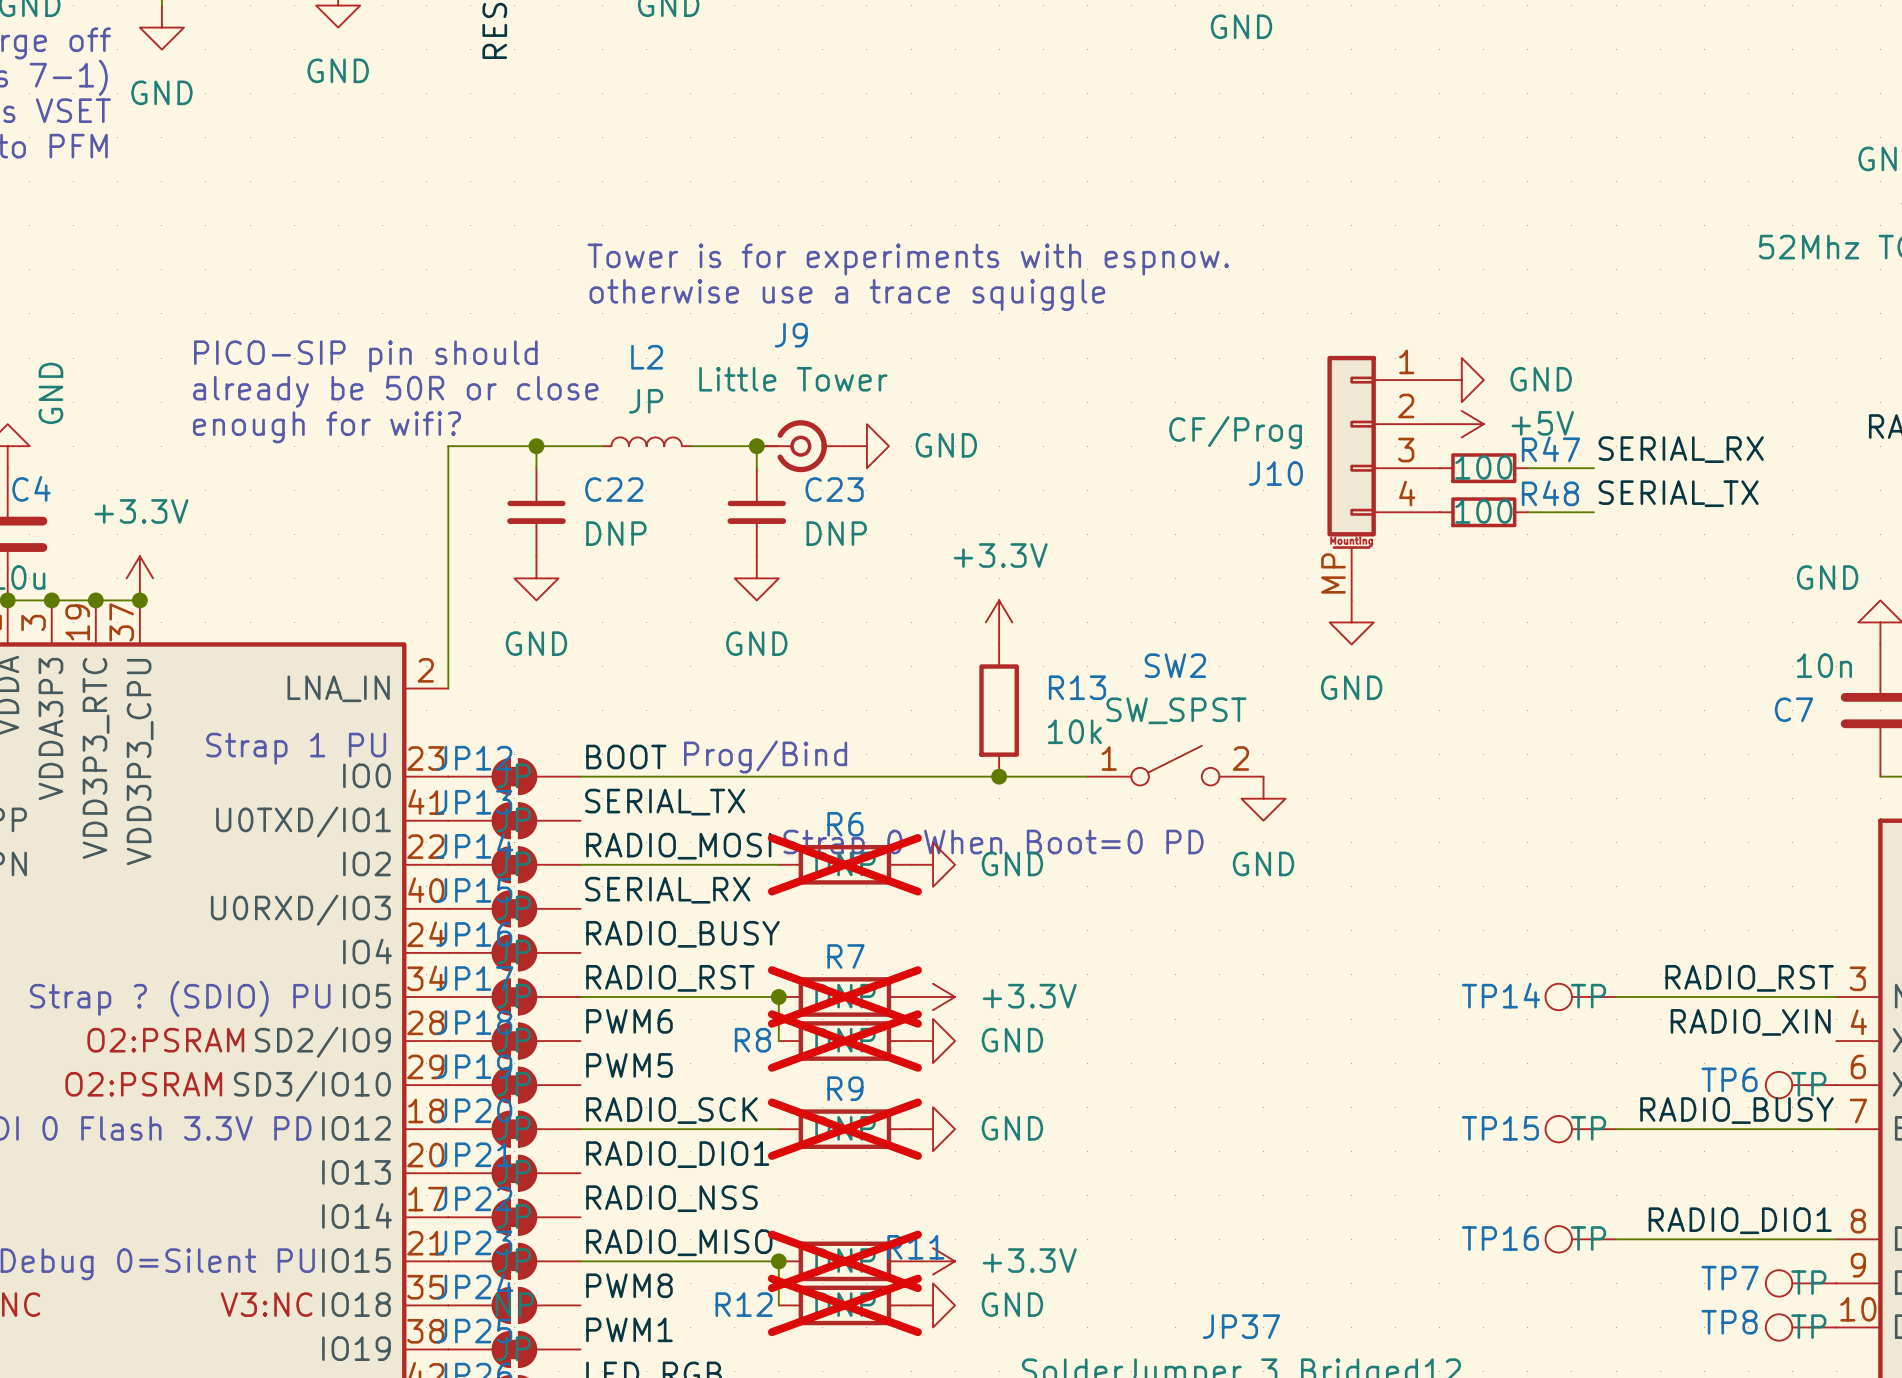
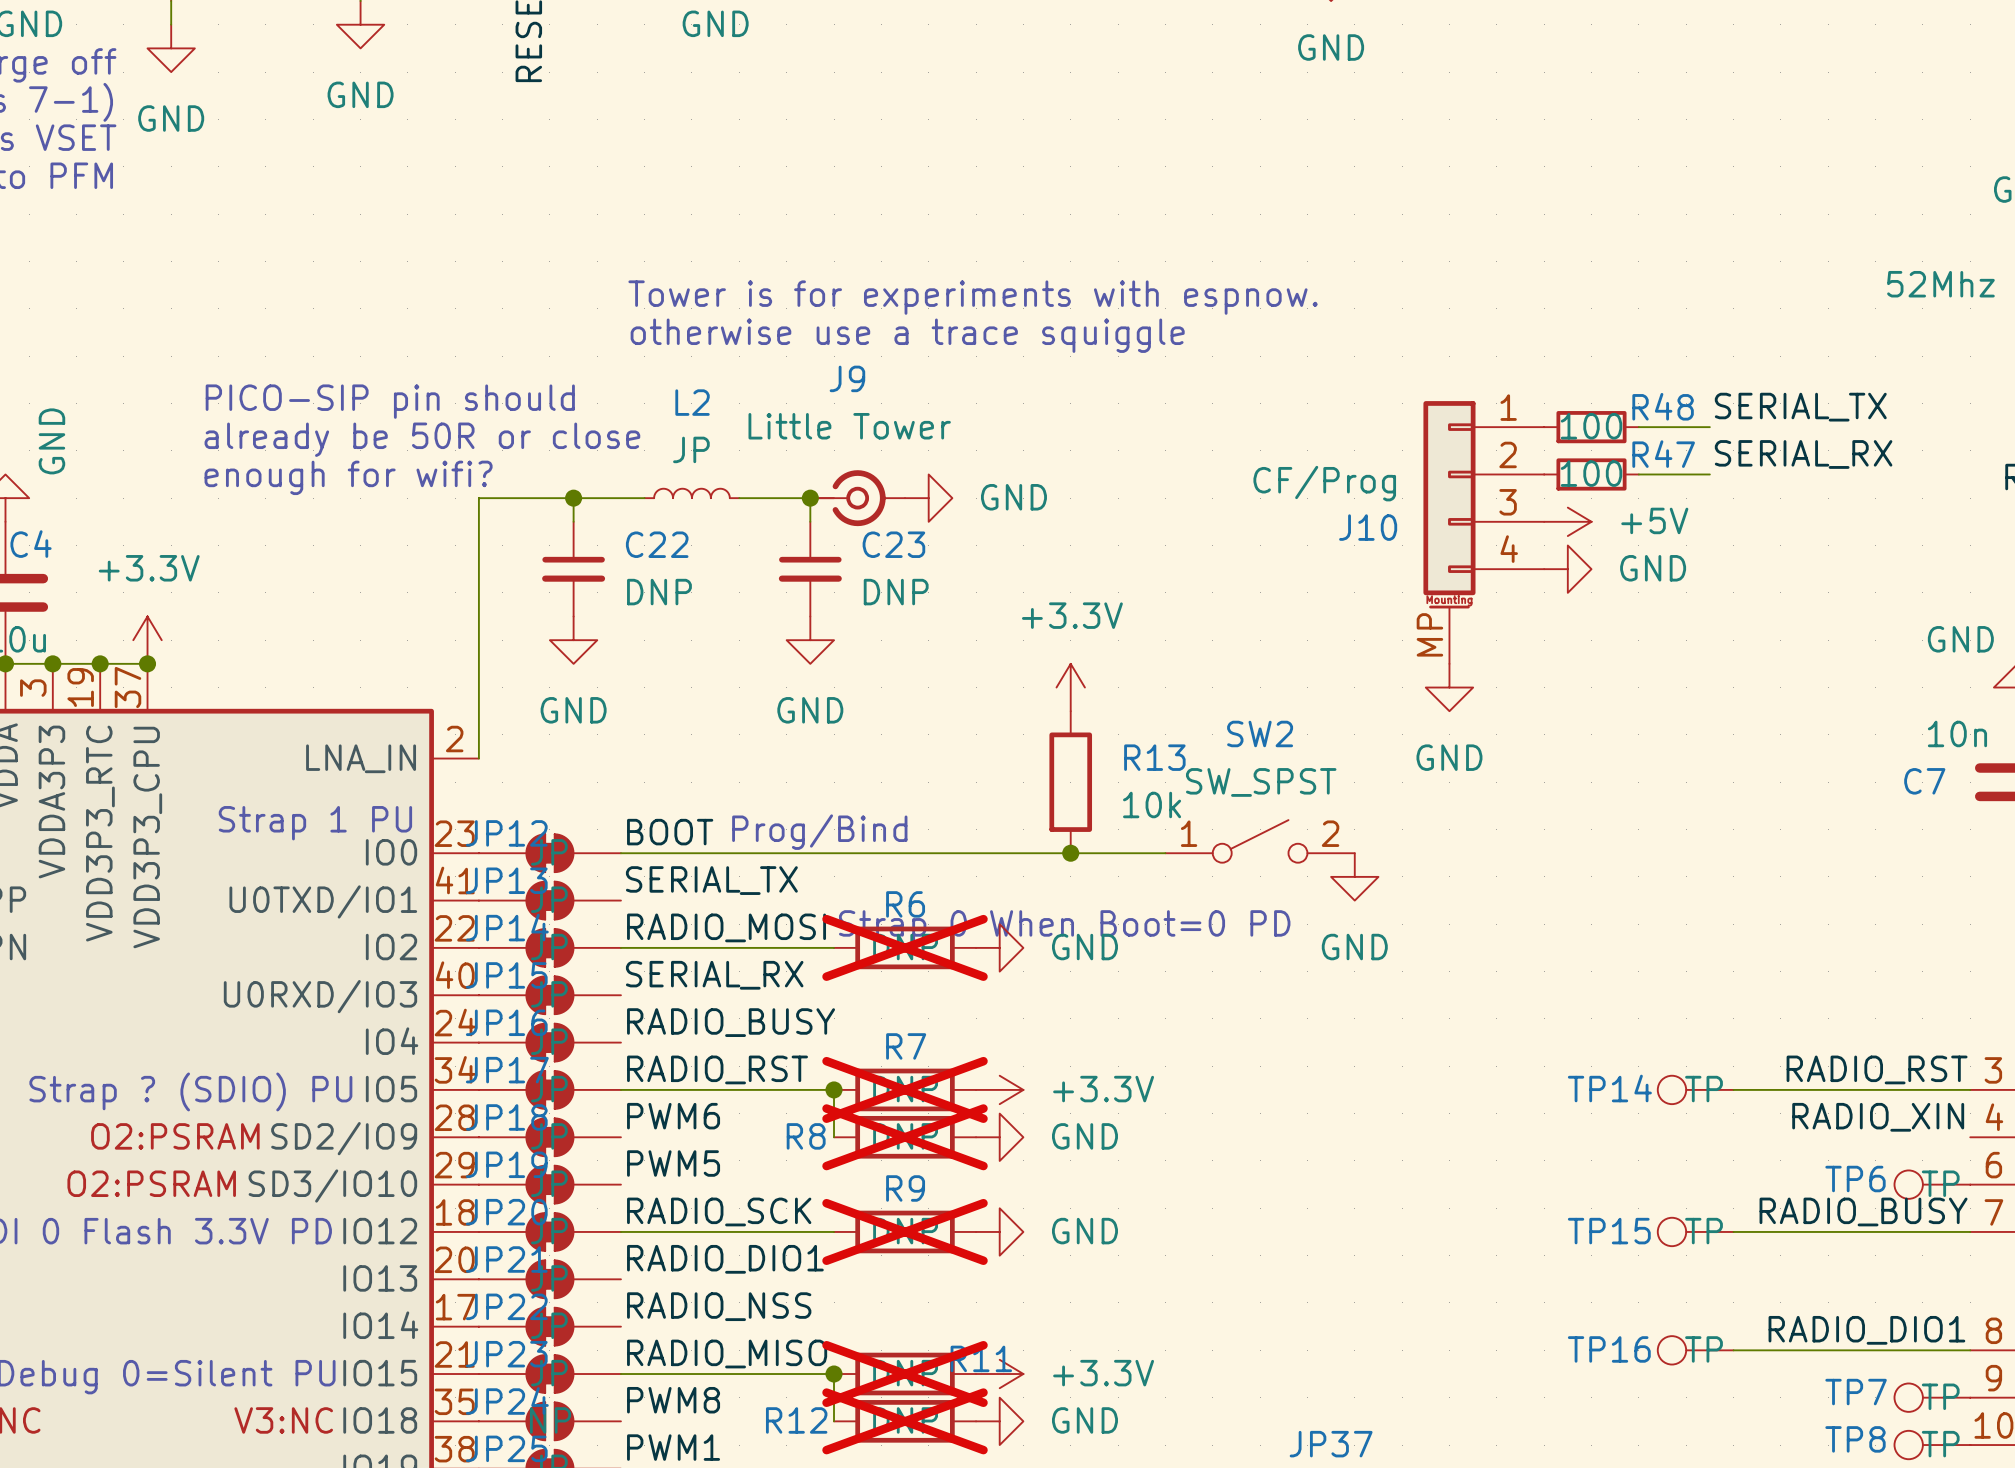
power symbol position: GND (1461, 380) -> GND (1567, 569)
power symbol position: +5V (1461, 424) -> +5V (1567, 521)
label position: SERIAL_RX (1681, 449) -> SERIAL_RX (1803, 454)
R47 position: (1483, 468) -> (1591, 474)
wire: (1527, 468) (1593, 468) -> (1638, 474) (1709, 474)
label position: SERIAL_TX (1678, 493) -> SERIAL_TX (1800, 407)
R48 position: (1483, 512) -> (1591, 427)
wire: (1527, 512) (1593, 512) -> (1638, 427) (1709, 427)

